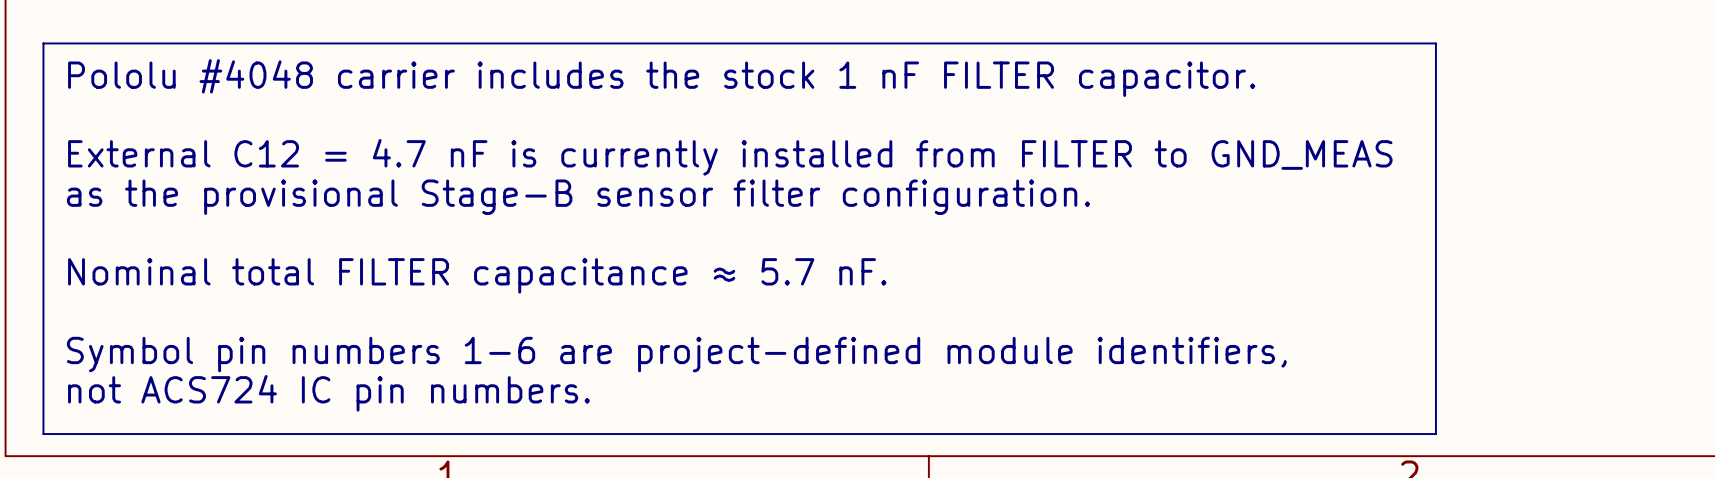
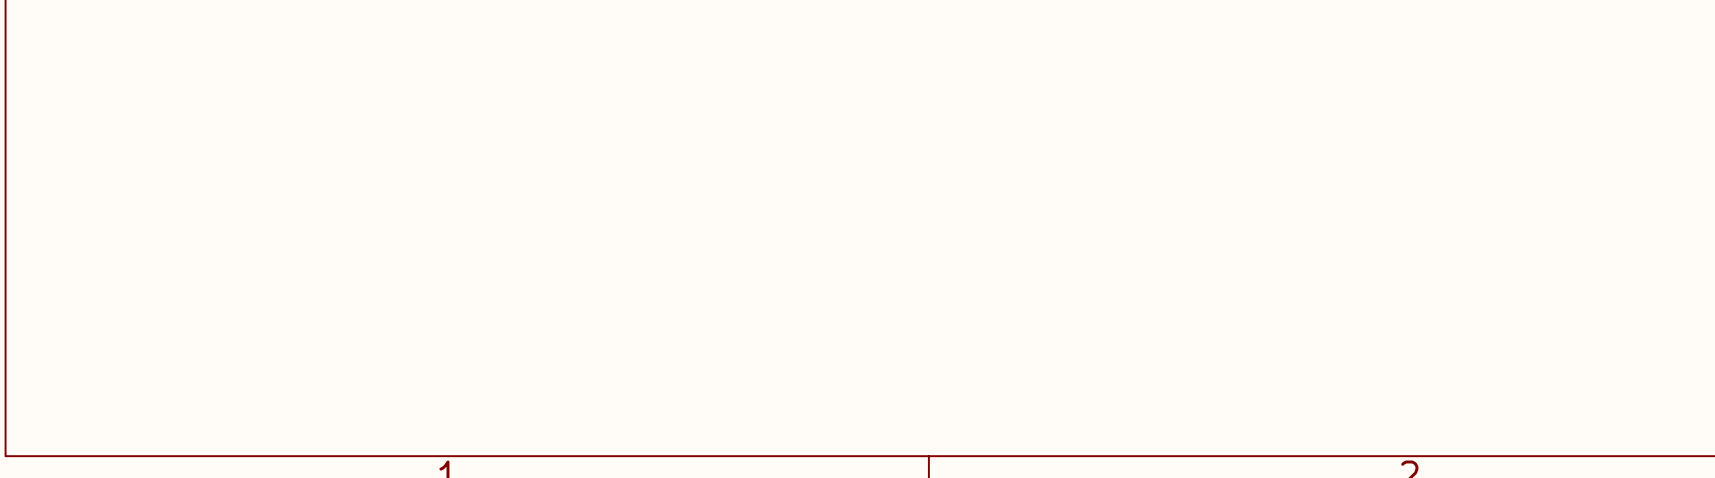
line: (43, 43) (1435, 43) (1435, 434) (43, 434) (43, 43) -> none
text: Pololu #4048 carrier includes the stock 1 nF FILTER capacitor. (661, 78) -> none
text: External C12 = 4.7 nF is currently installed from FILTER to GND_MEAS (730, 157) -> none
text: as the provisional Stage-B sensor filter configuration. (578, 197) -> none
text: Nominal total FILTER capacitance ≈ 5.7 nF. (477, 275) -> none
text: Symbol pin numbers 1-6 are project-defined module identifiers, (676, 354) -> none
text: not ACS724 IC pin numbers. (328, 393) -> none

